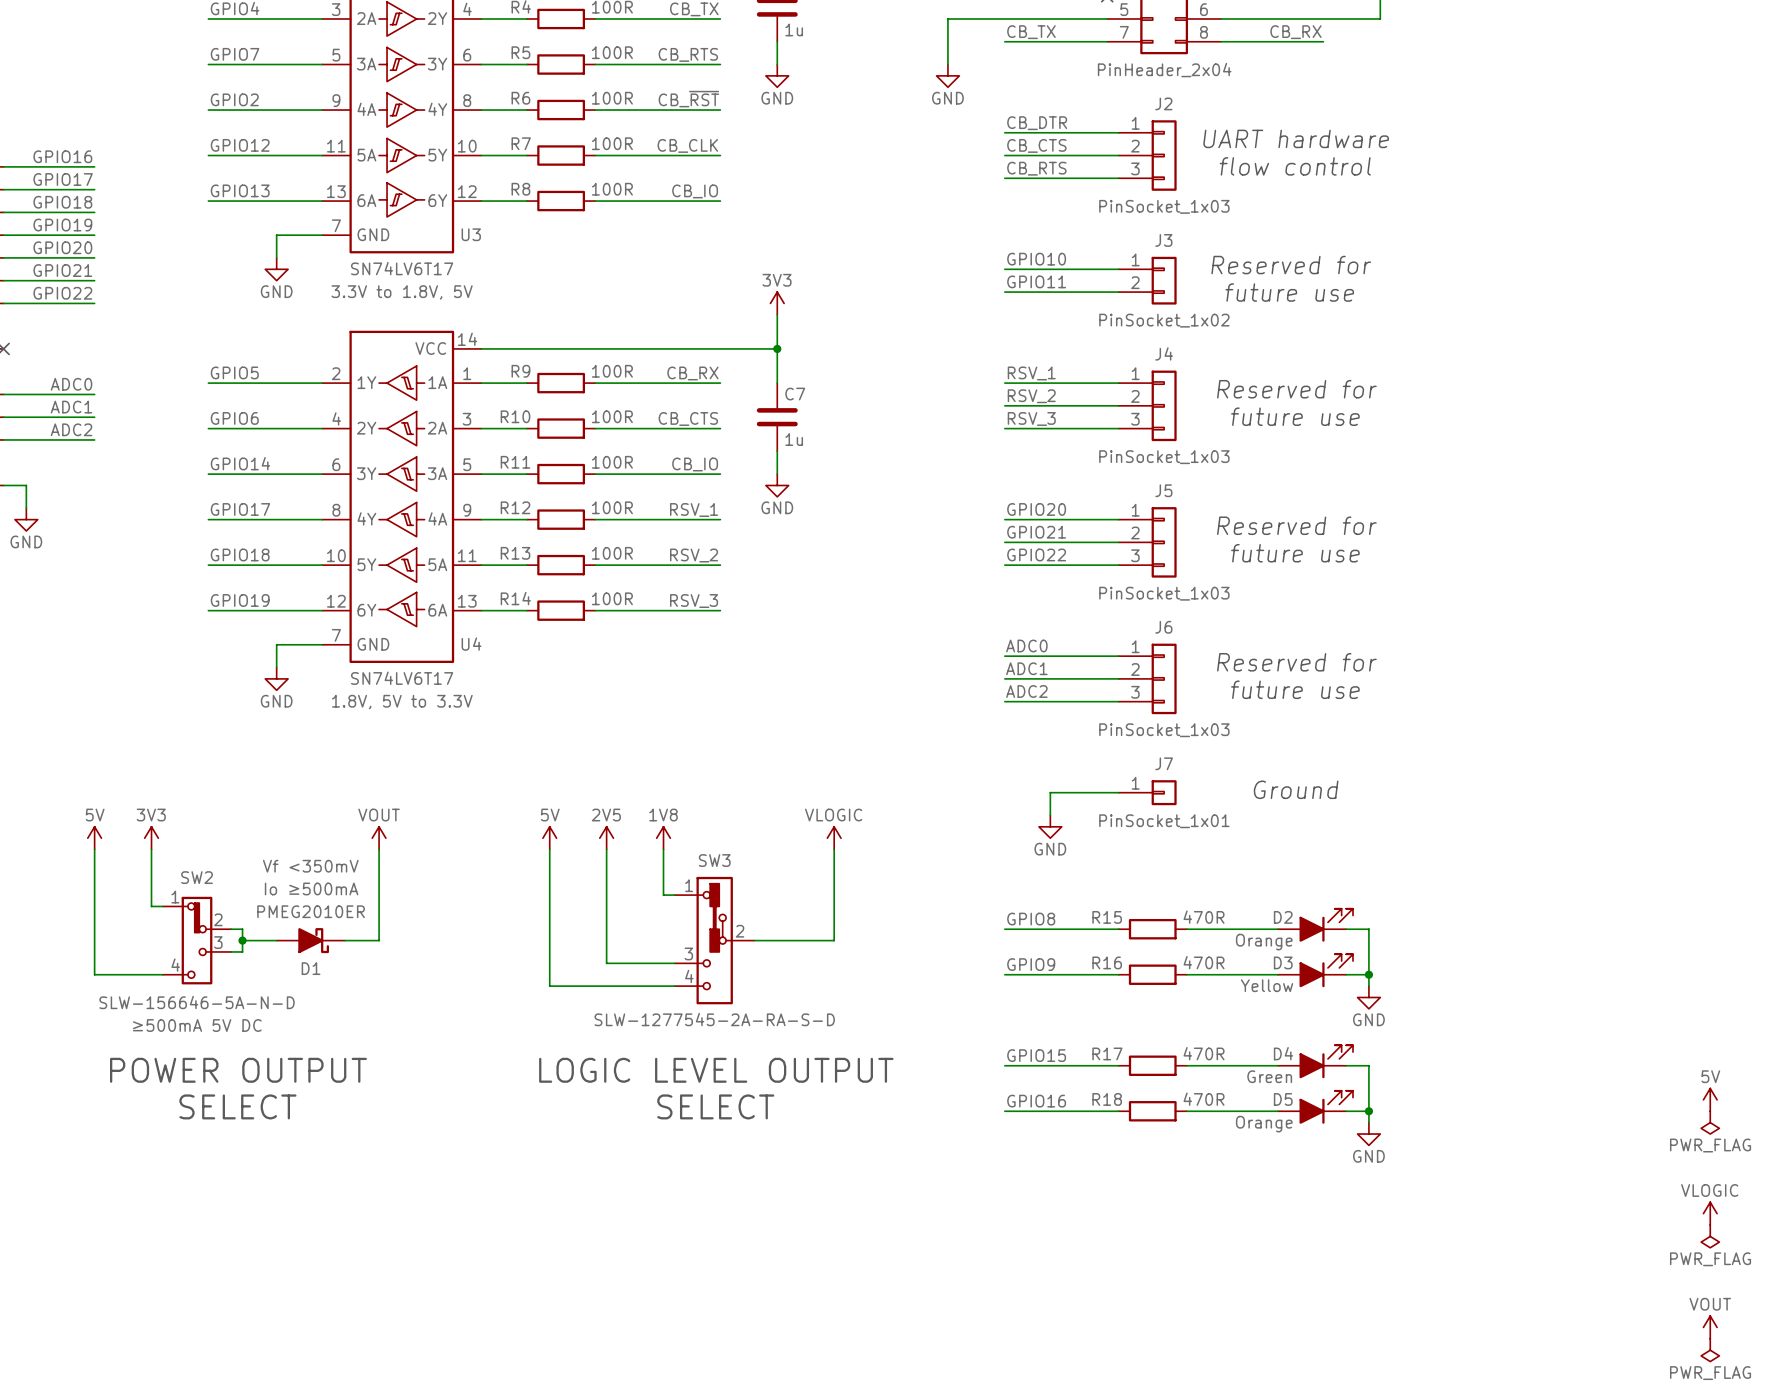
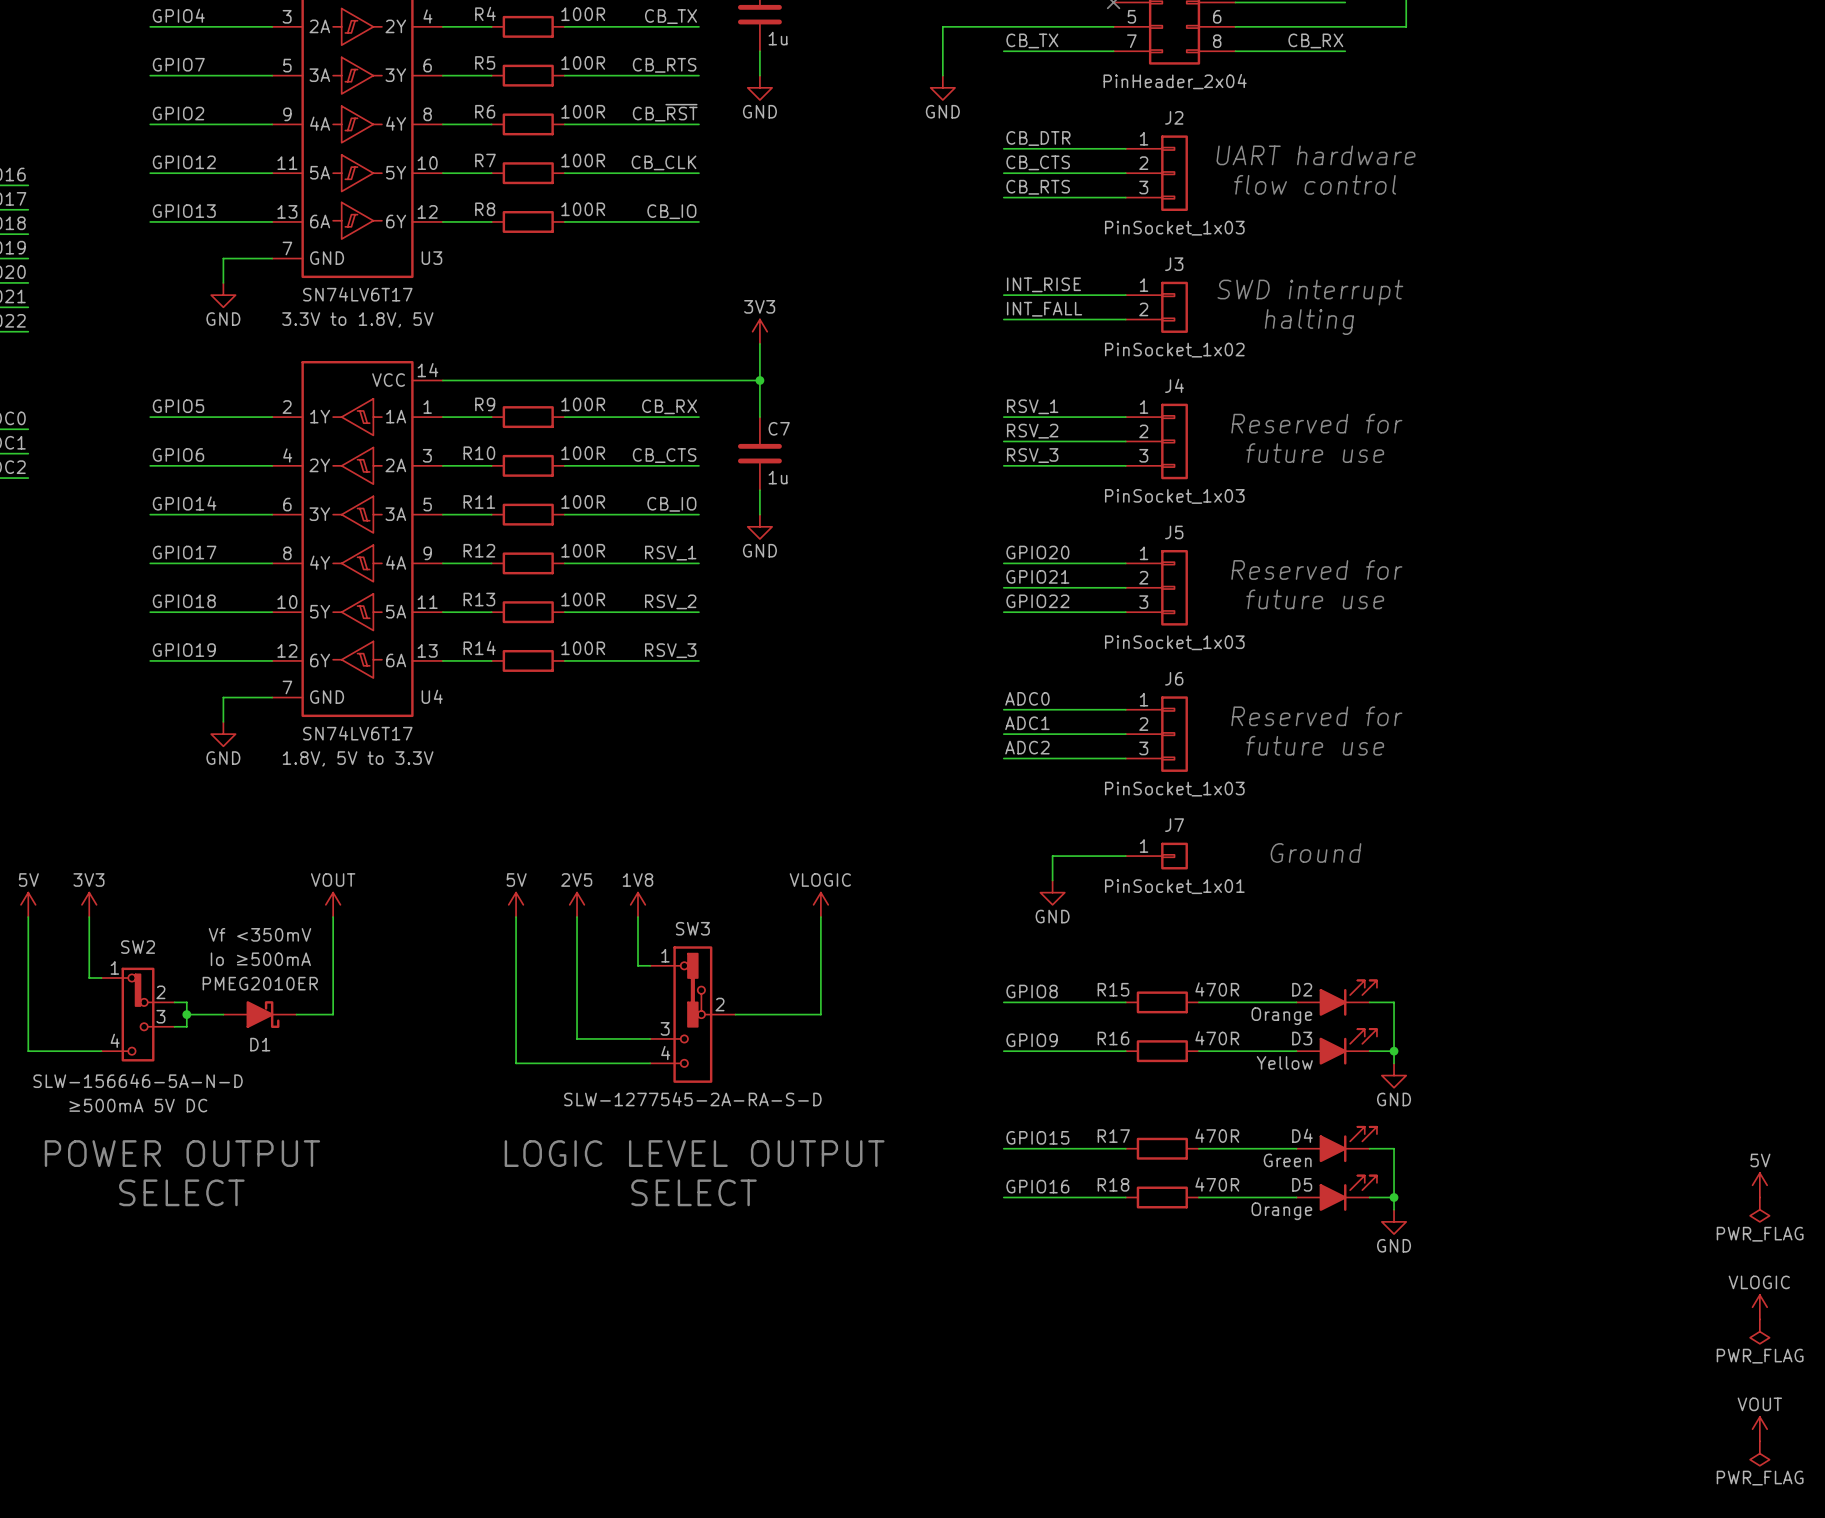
label: GPIO10 (1036, 259) -> INT_RISE (1043, 284)
text: Reserved for (1291, 265) -> none
text: none -> SWD interrupt (1310, 292)
label: GPIO11 (1036, 281) -> INT_FALL (1044, 309)
text: future use (1289, 292) -> none
text: none -> halting (1309, 322)

